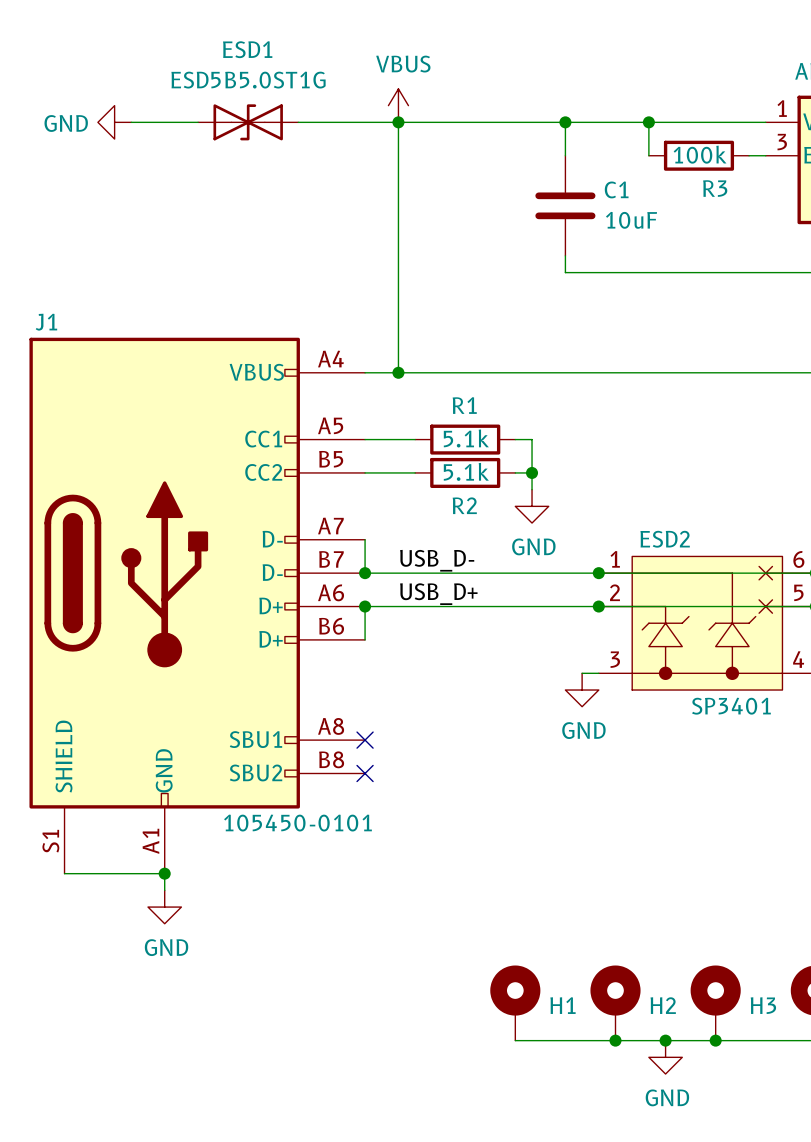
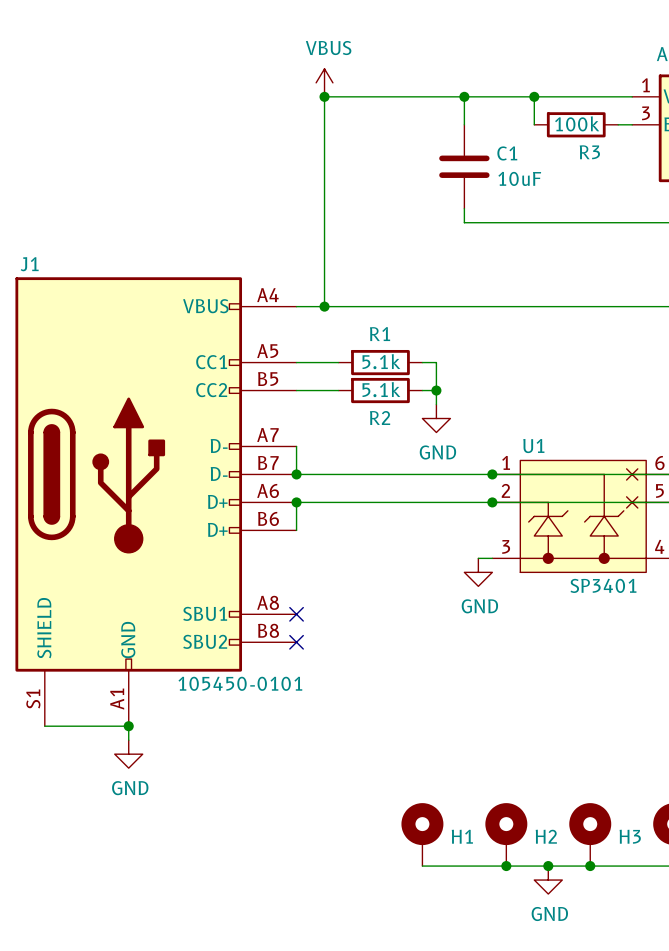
power symbol: GND (114, 122) -> none
wire: (131, 122) (198, 122) -> none
ESD1: ESD5B5.0ST1G (248, 122) -> none
wire: (298, 122) (398, 122) -> none
ESD2 name: ESD2 (665, 539) -> U1 (533, 446)
label: USB_D- (437, 560) -> none
label: USB_D+ (438, 594) -> none

